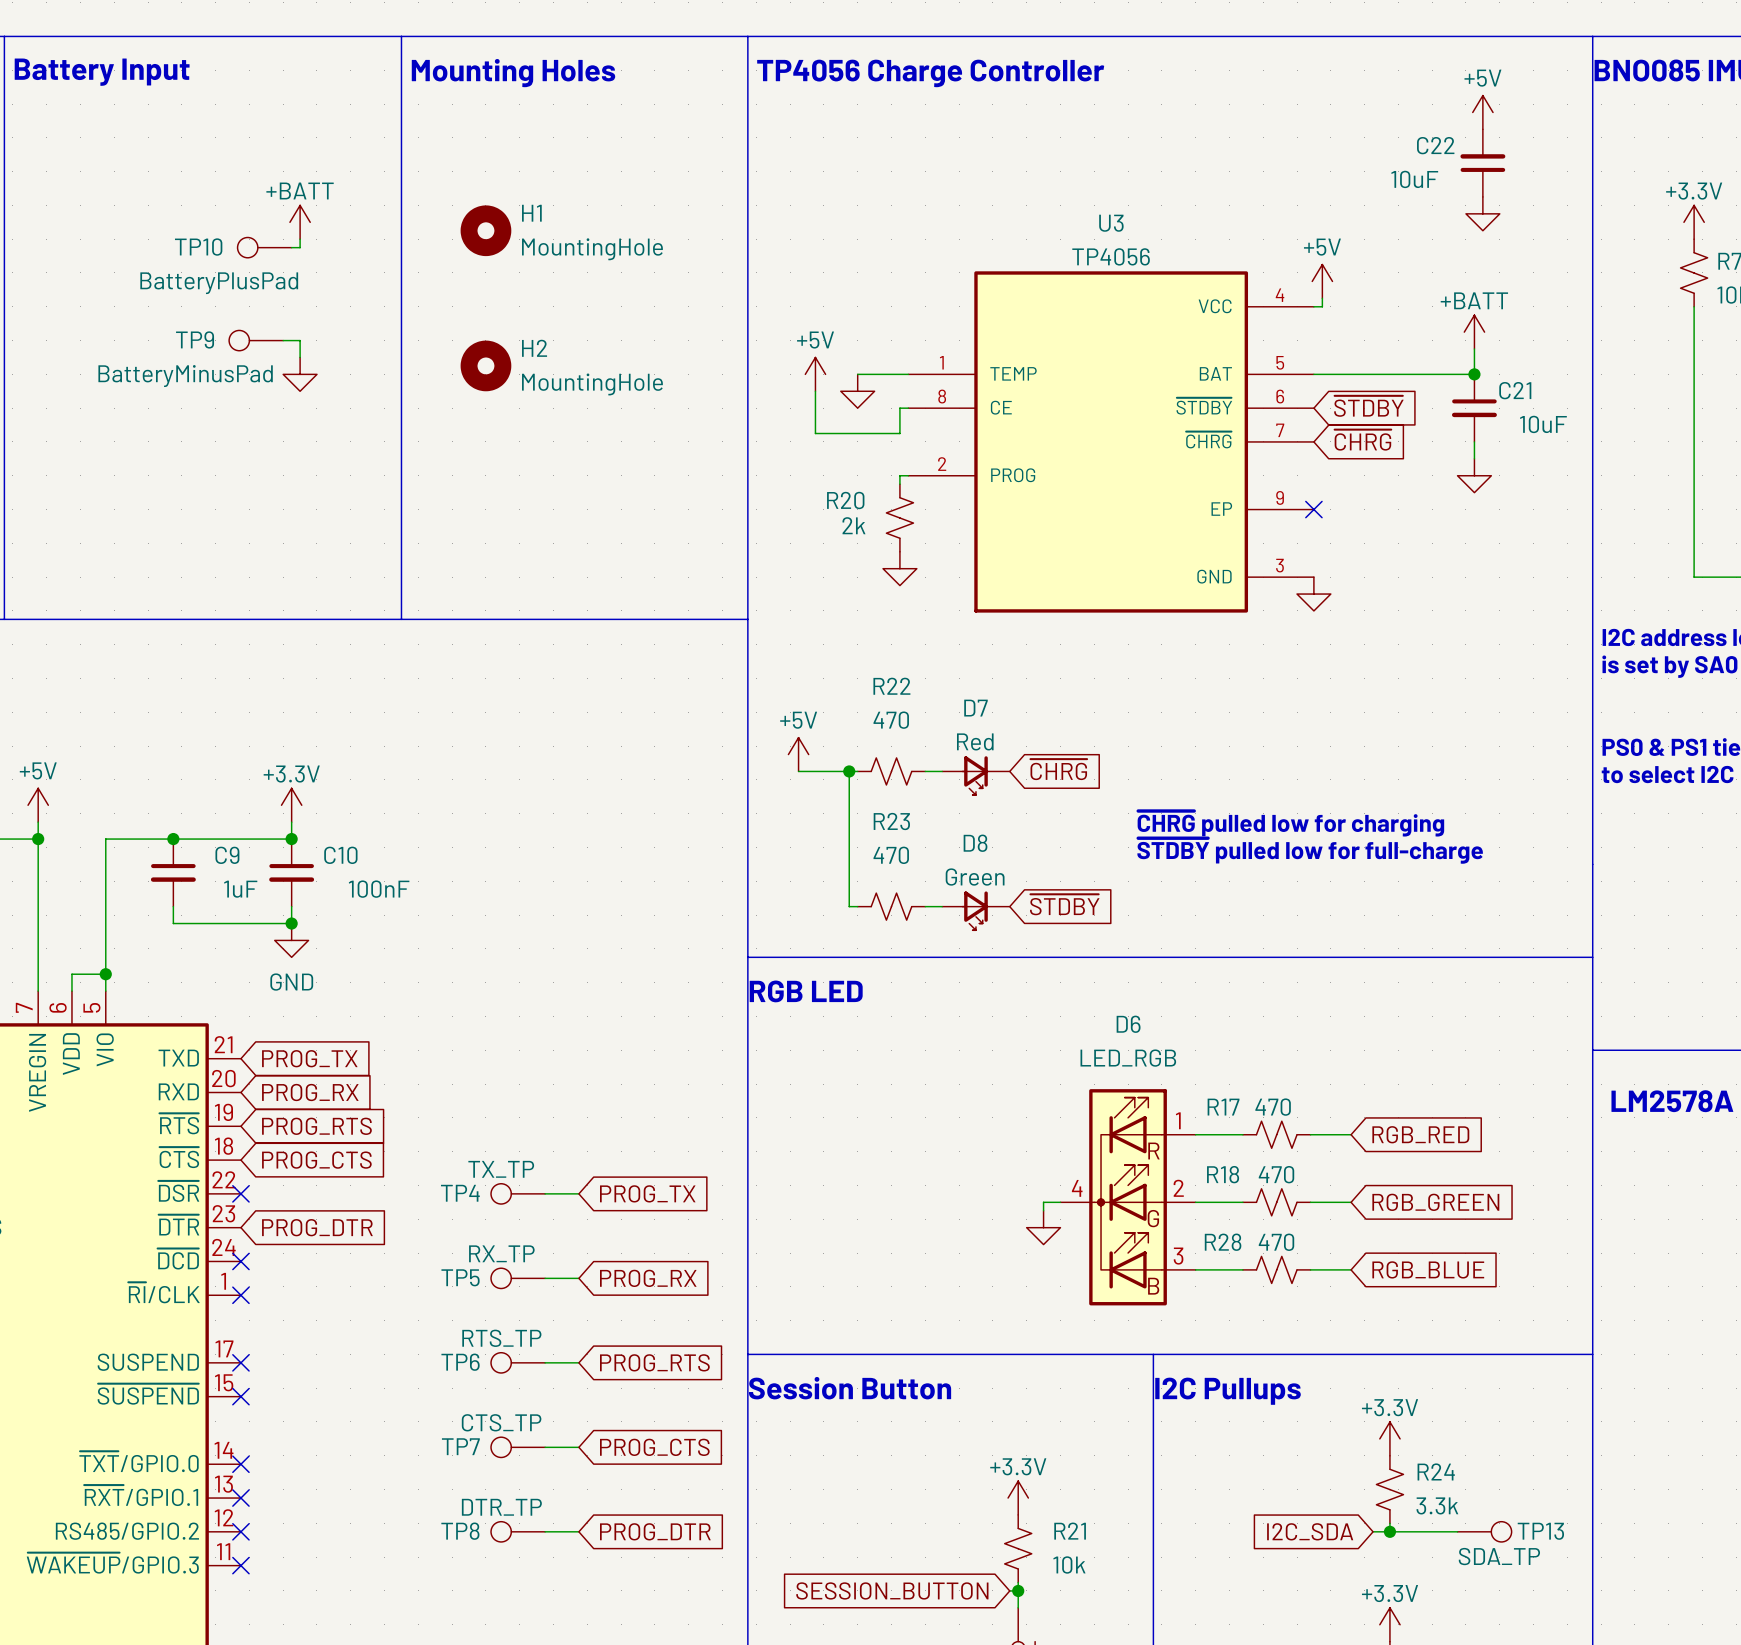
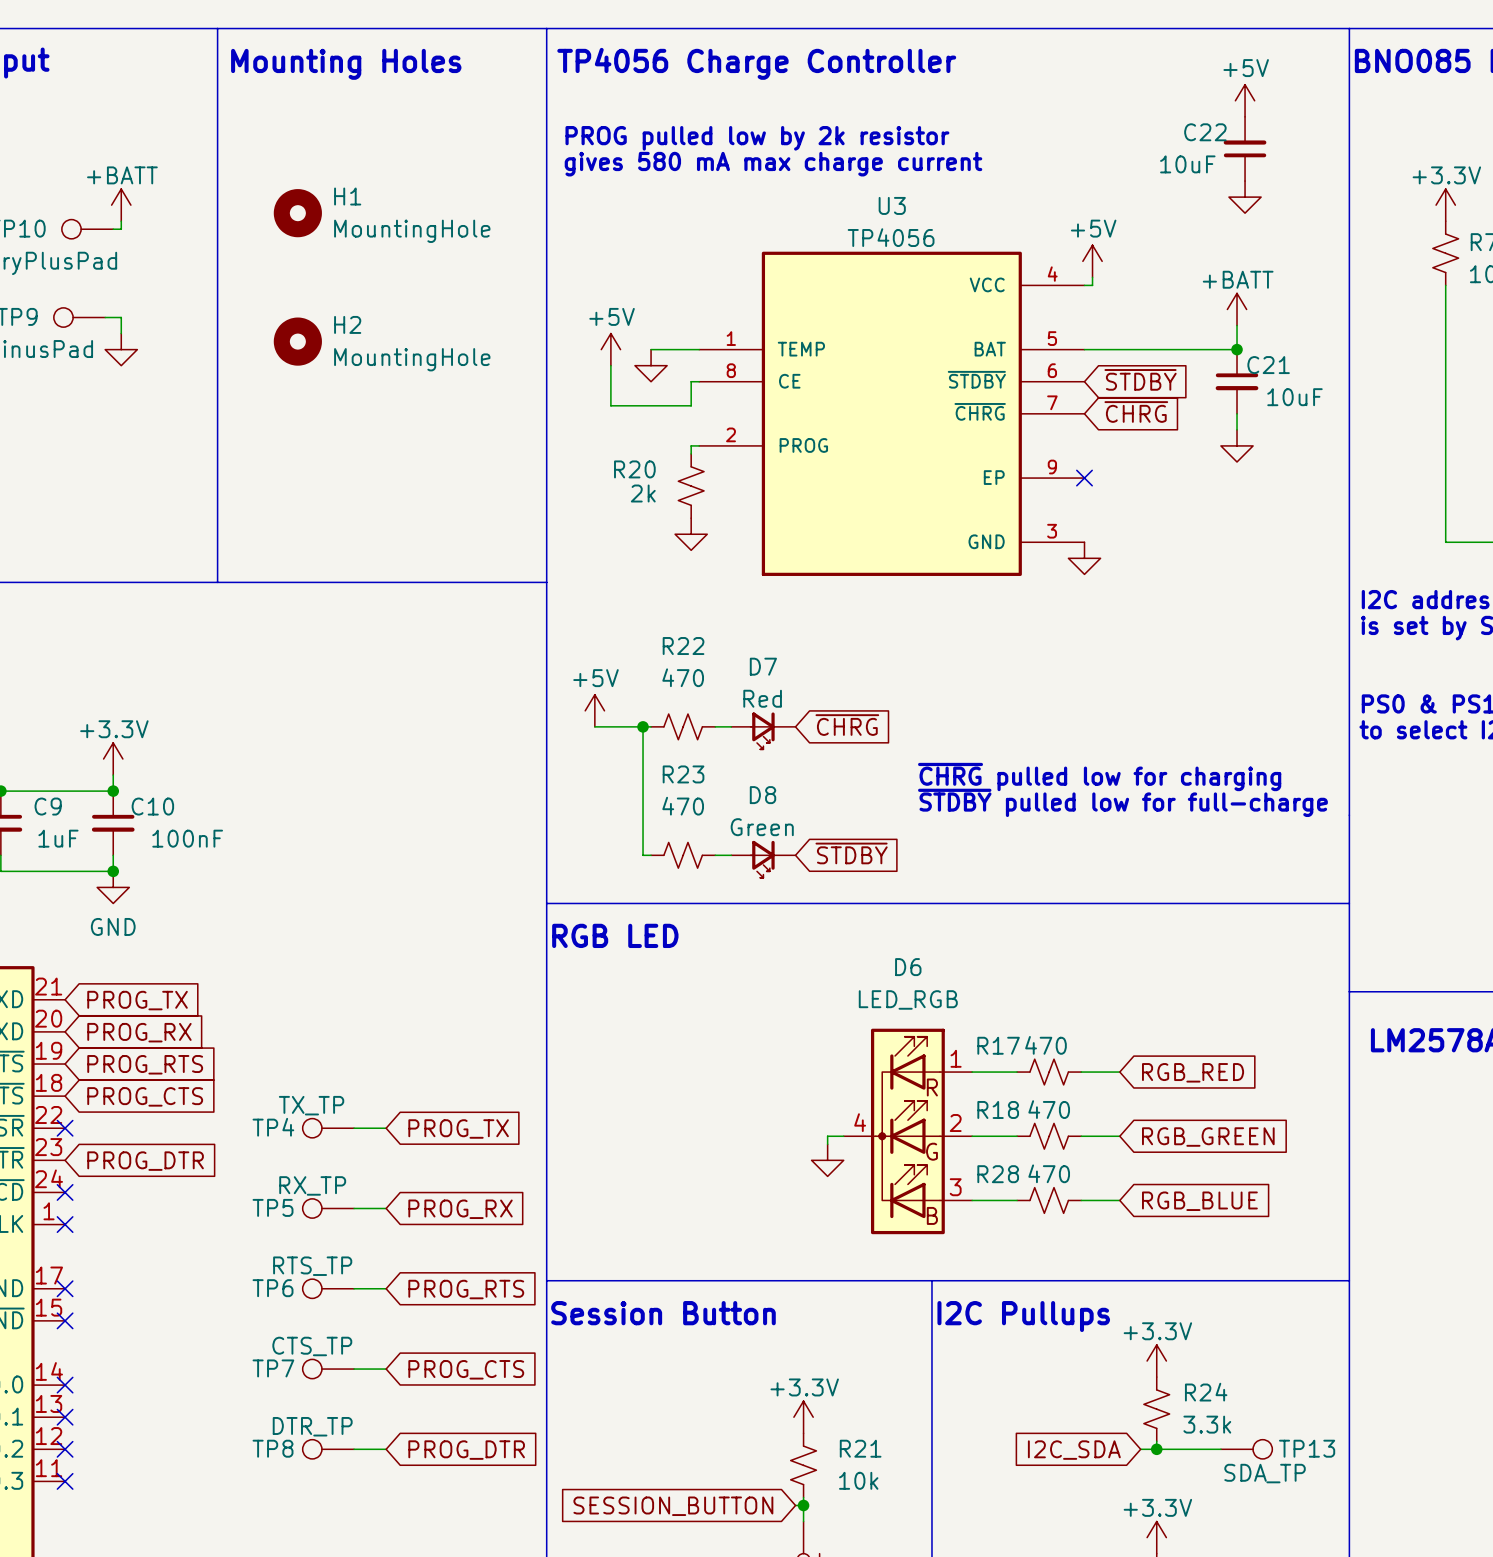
text: none -> PROG pulled low by 2k resistor (757, 138)
text: none -> gives 580 mA max charge current (773, 164)

